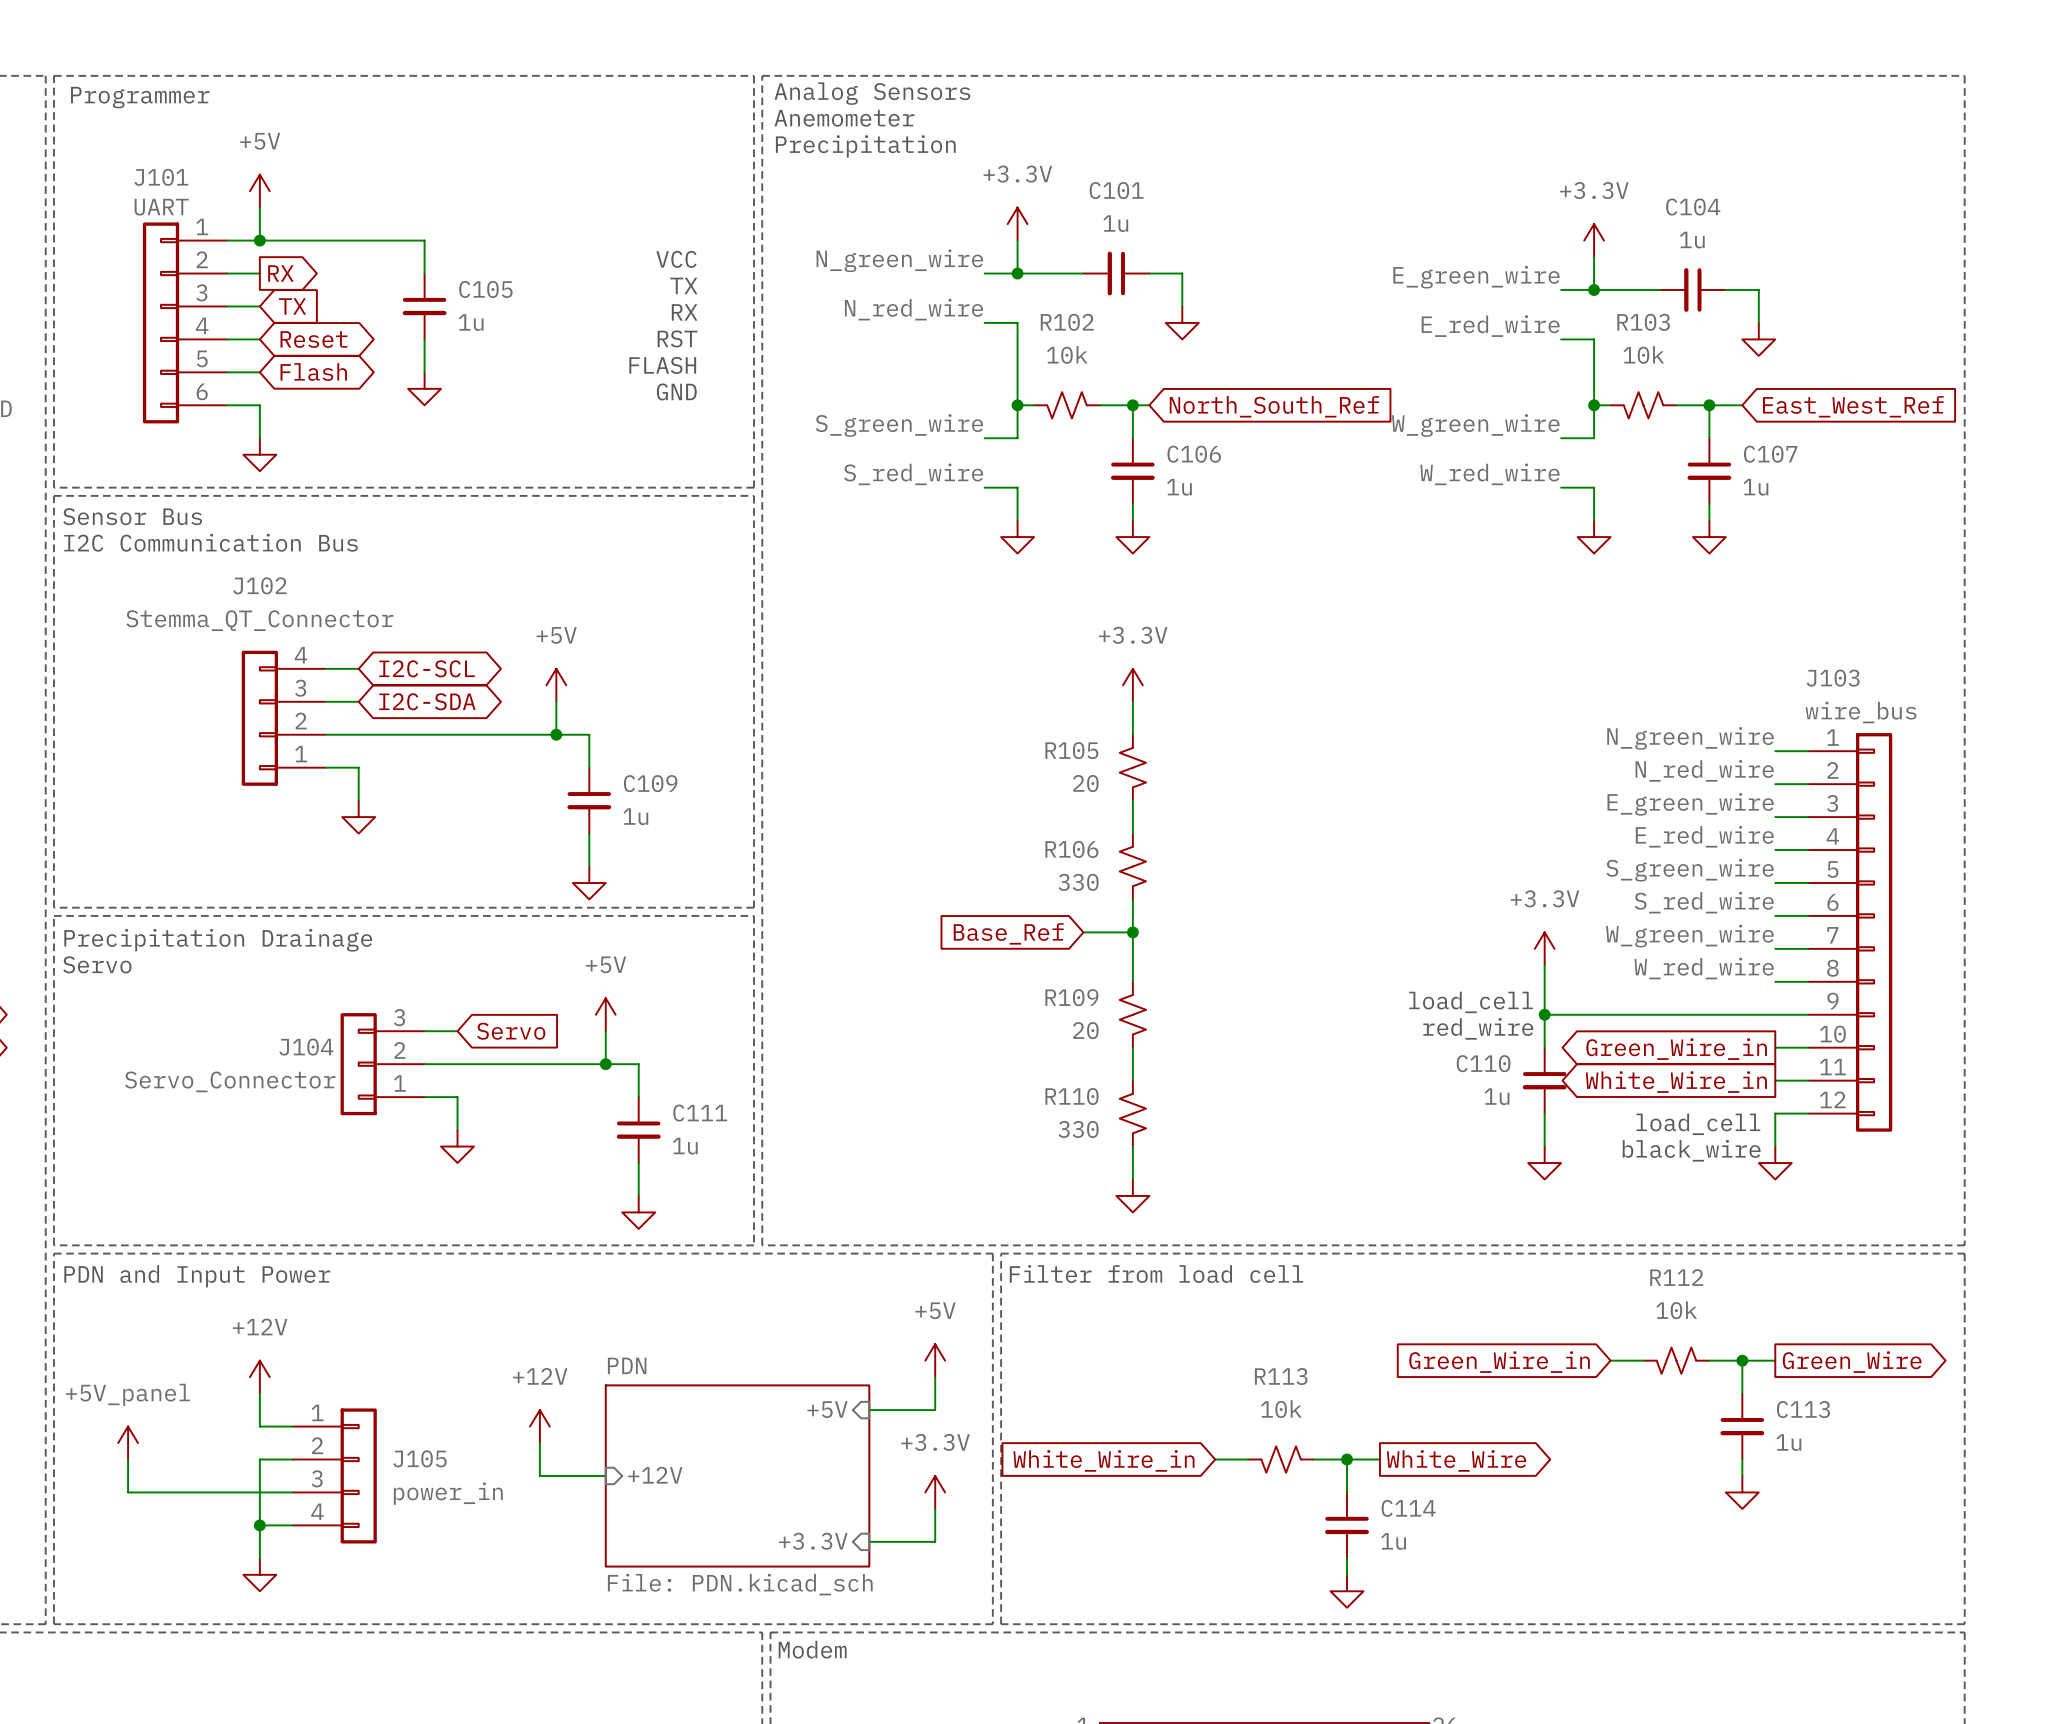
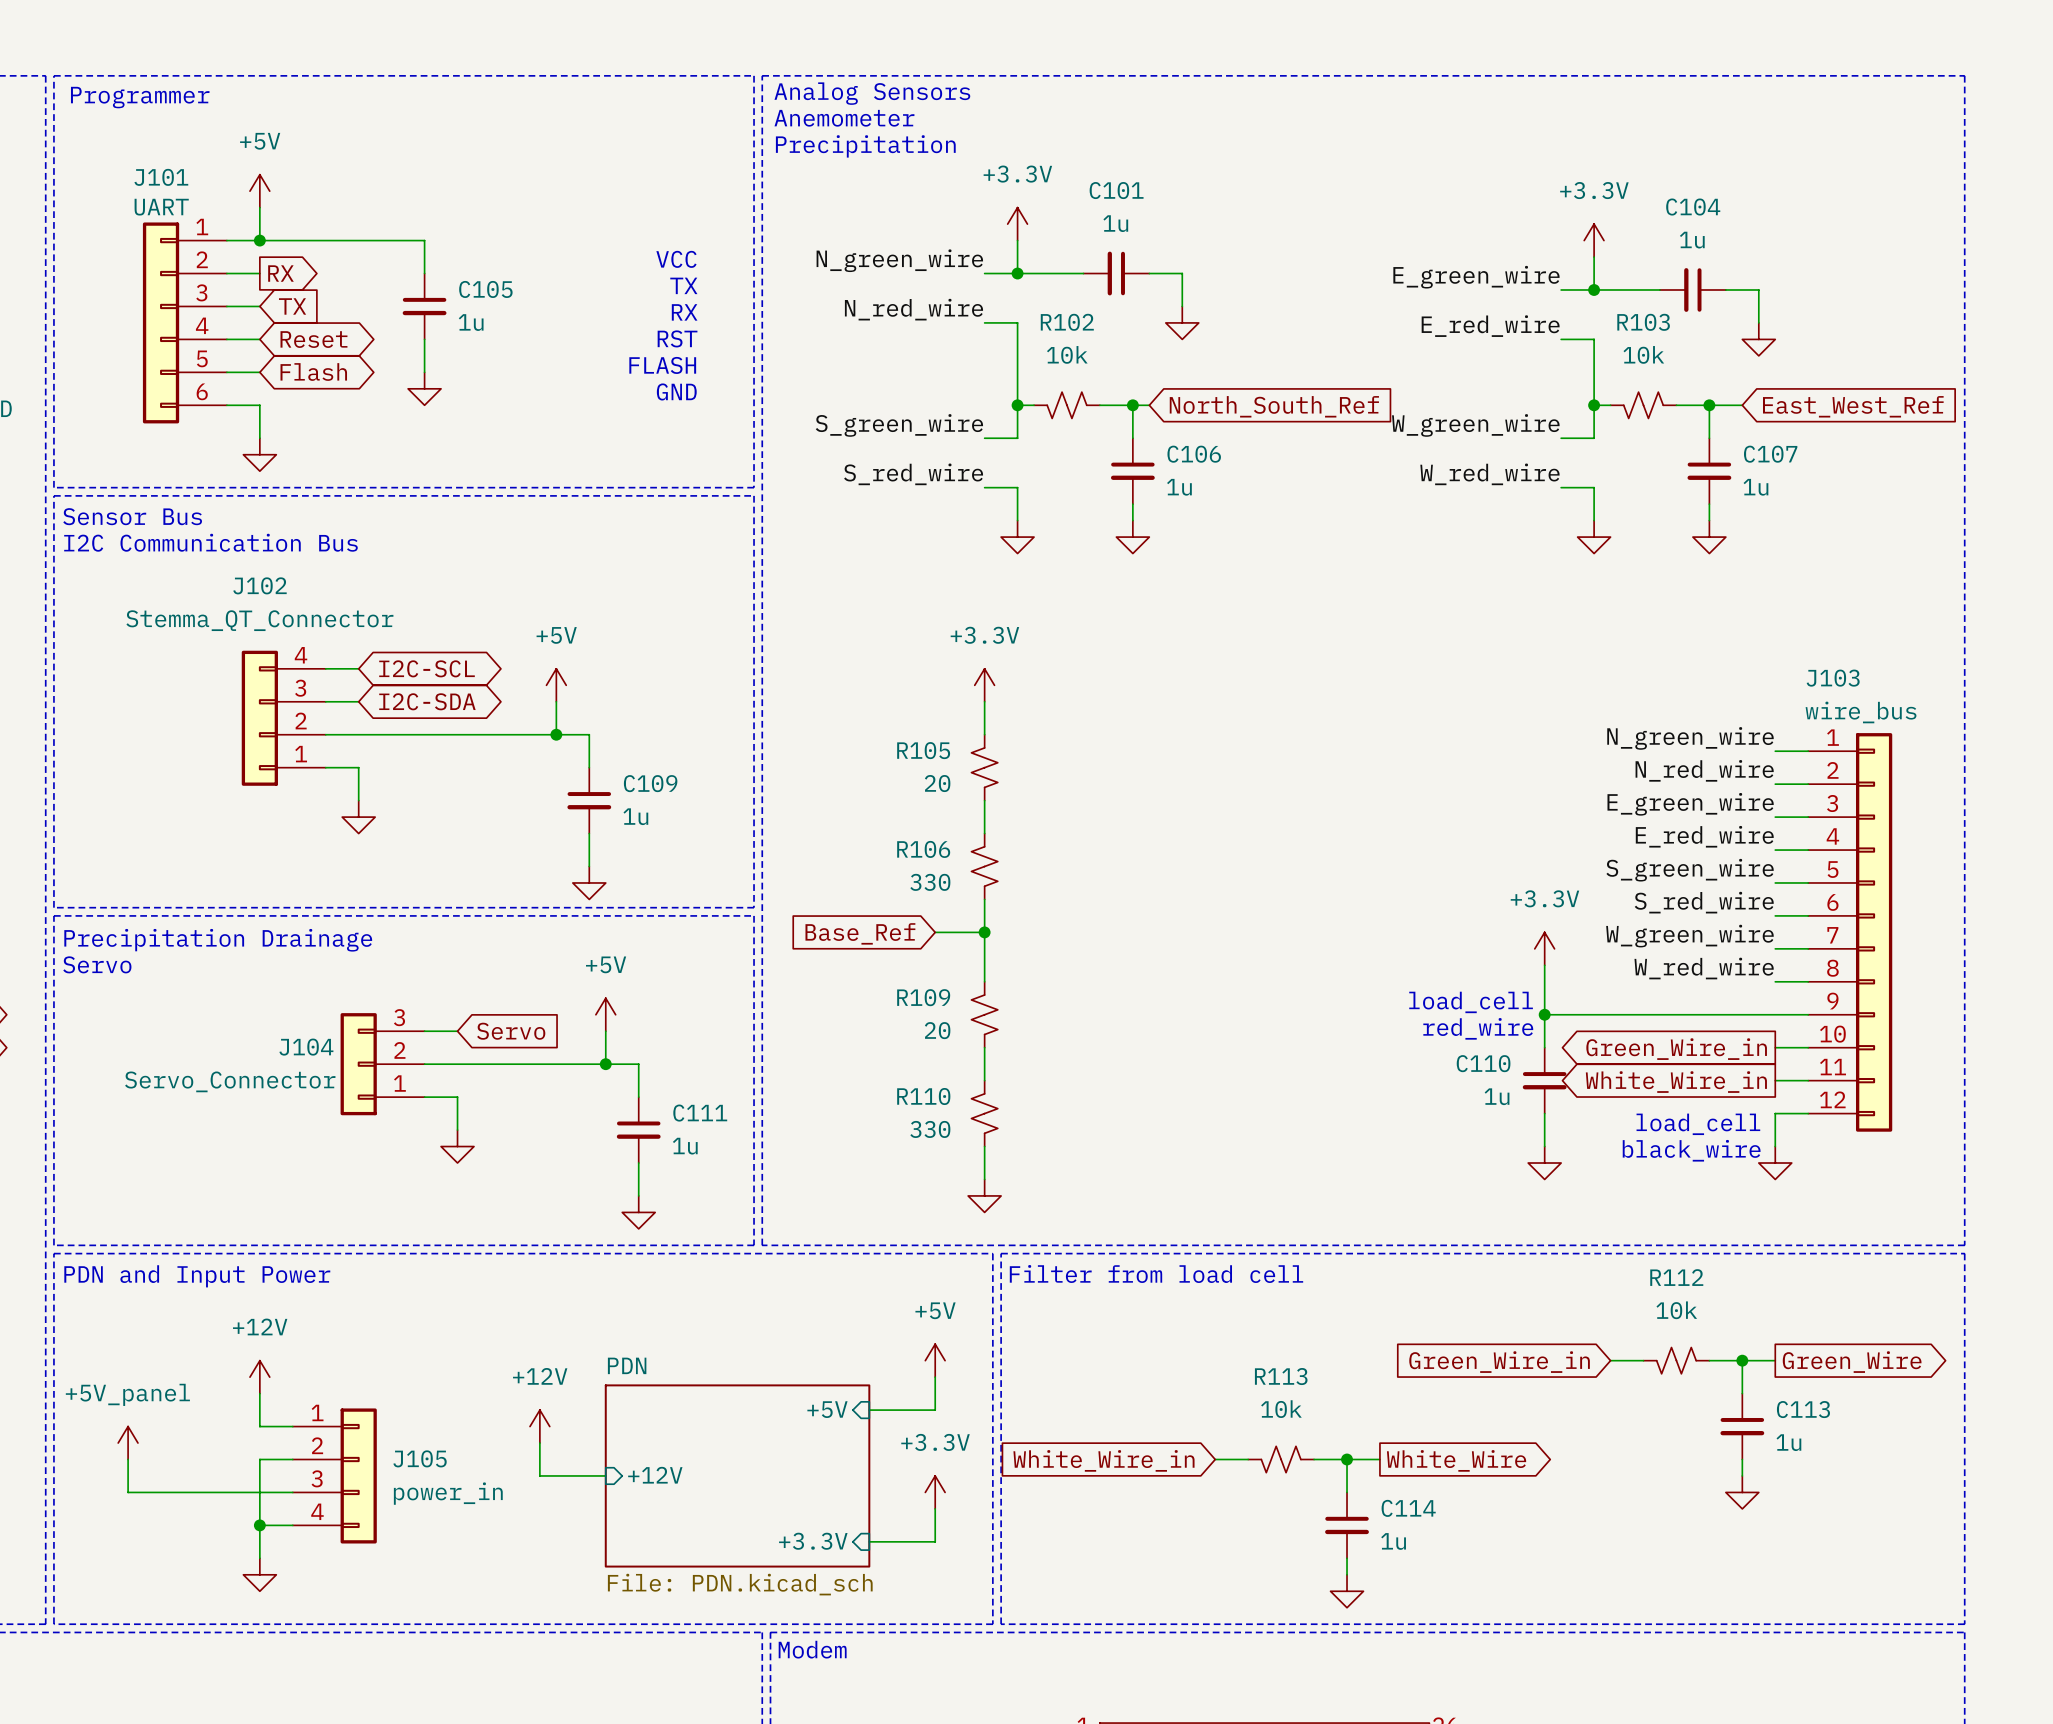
power symbol position: +3.3V (1132, 685) -> +3.3V (984, 685)
wire: (1132, 701) (1132, 734) -> (984, 701) (984, 734)
R105 position: (1132, 767) -> (984, 767)
wire: (1132, 800) (1132, 833) -> (984, 800) (984, 833)
R106 position: (1132, 866) -> (984, 866)
wire: (1132, 899) (1132, 981) -> (984, 899) (984, 981)
junction: none -> (984, 932)
wire: (1083, 932) (1132, 932) -> (935, 932) (984, 932)
junction: (1132, 932) -> none
global label position: Base_Ref (1008, 933) -> Base_Ref (860, 933)
R109 position: (1132, 1014) -> (984, 1014)
wire: (1132, 1047) (1132, 1080) -> (984, 1047) (984, 1080)
R110 position: (1132, 1113) -> (984, 1113)
wire: (1132, 1146) (1132, 1179) -> (984, 1146) (984, 1179)
power symbol position: (1132, 1195) -> (984, 1195)

